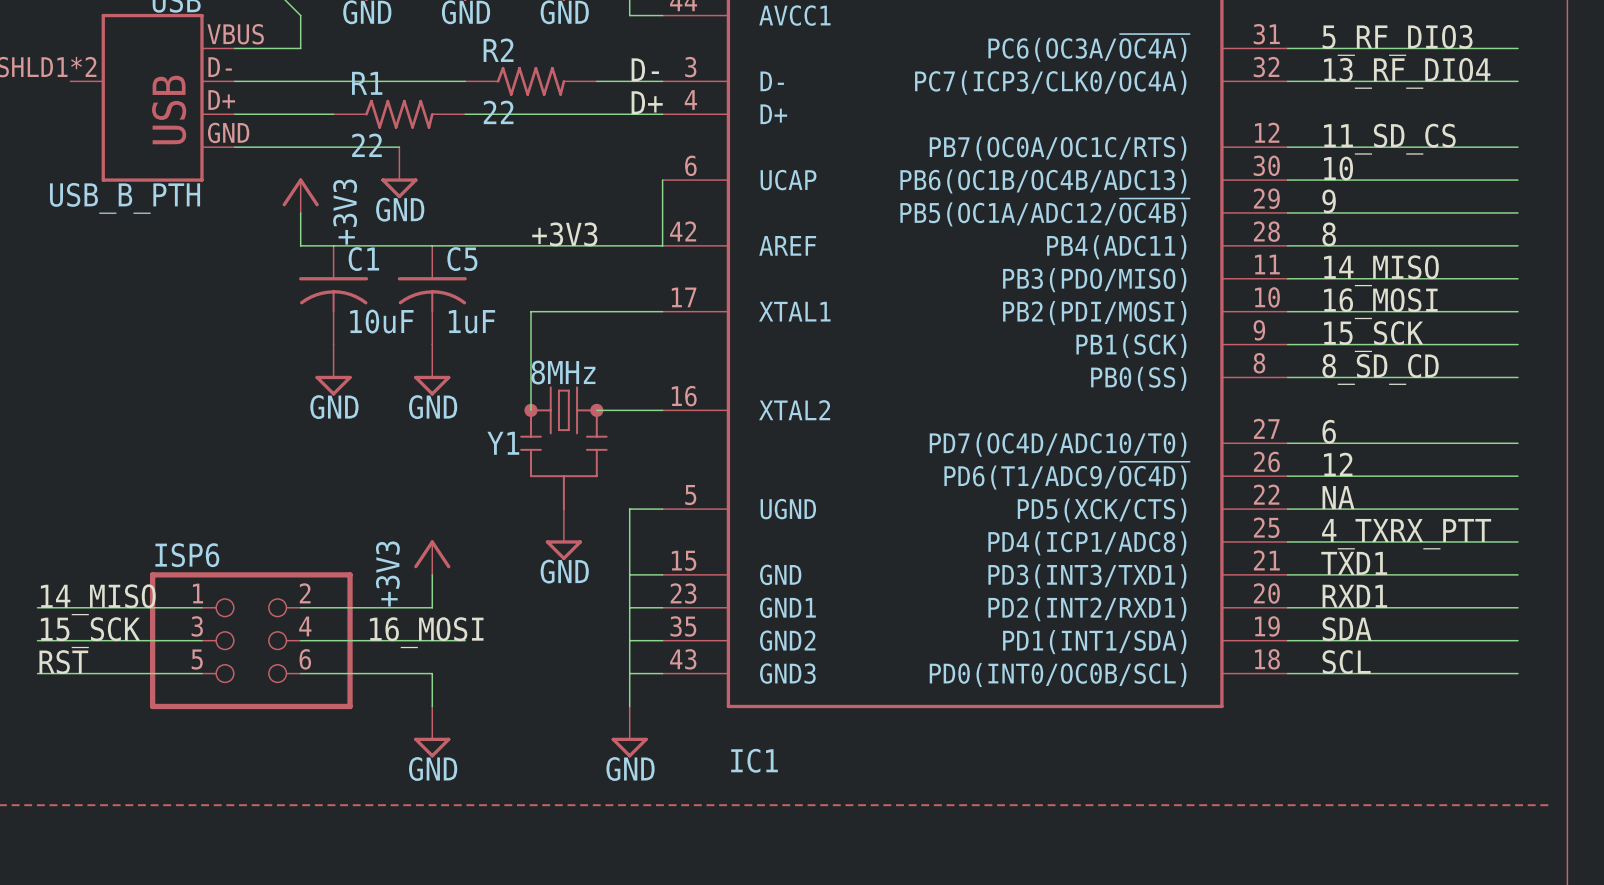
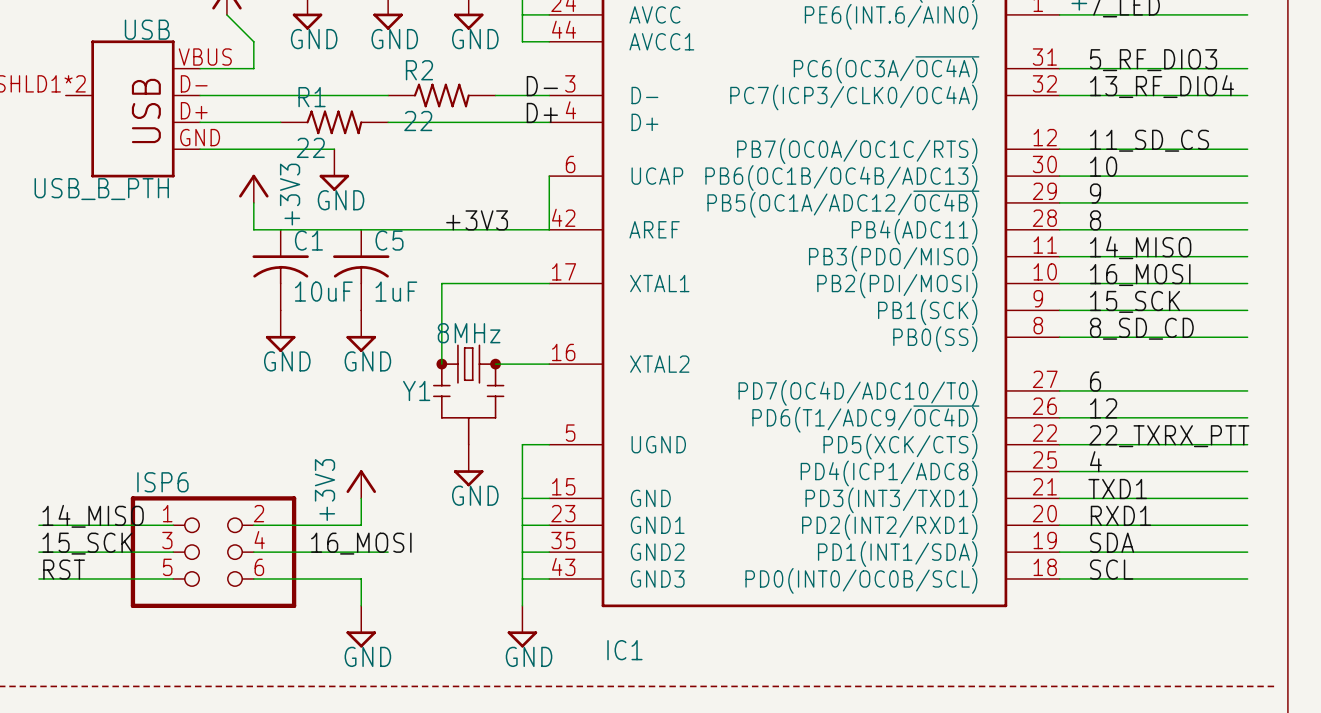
label: NA (1338, 497) -> 22_TXRX_PTT (1169, 436)
label: 4_TXRX_PTT (1406, 534) -> 4 (1095, 461)

